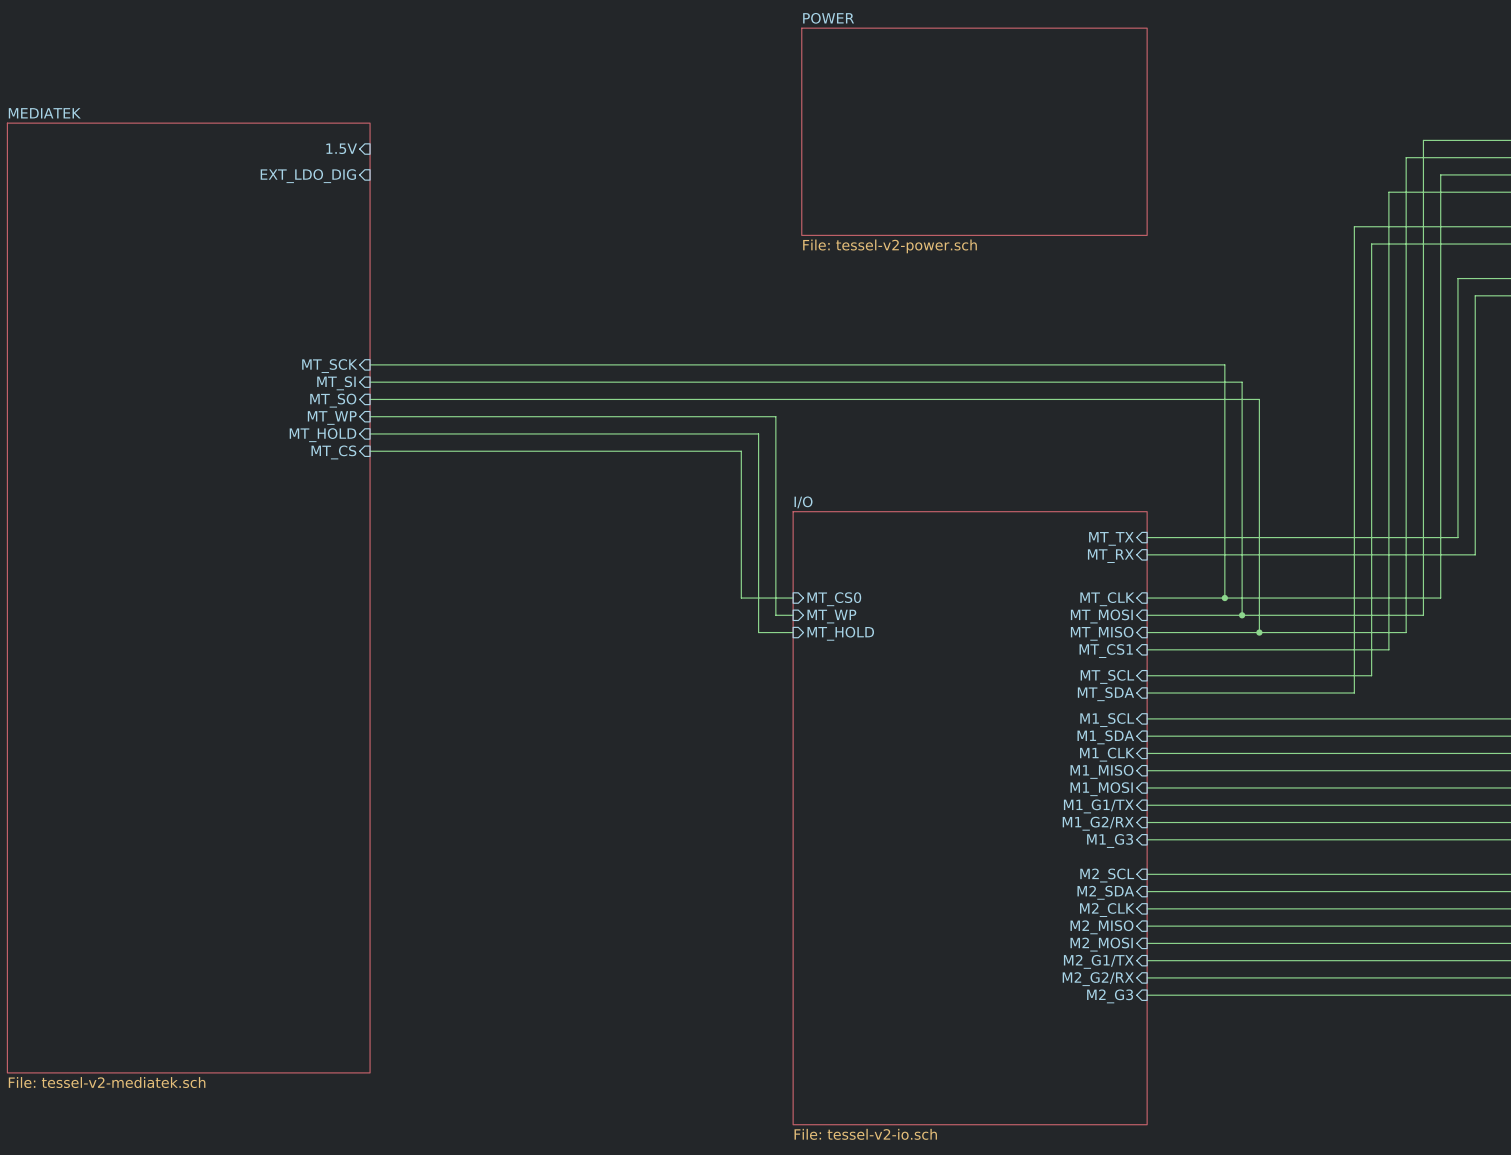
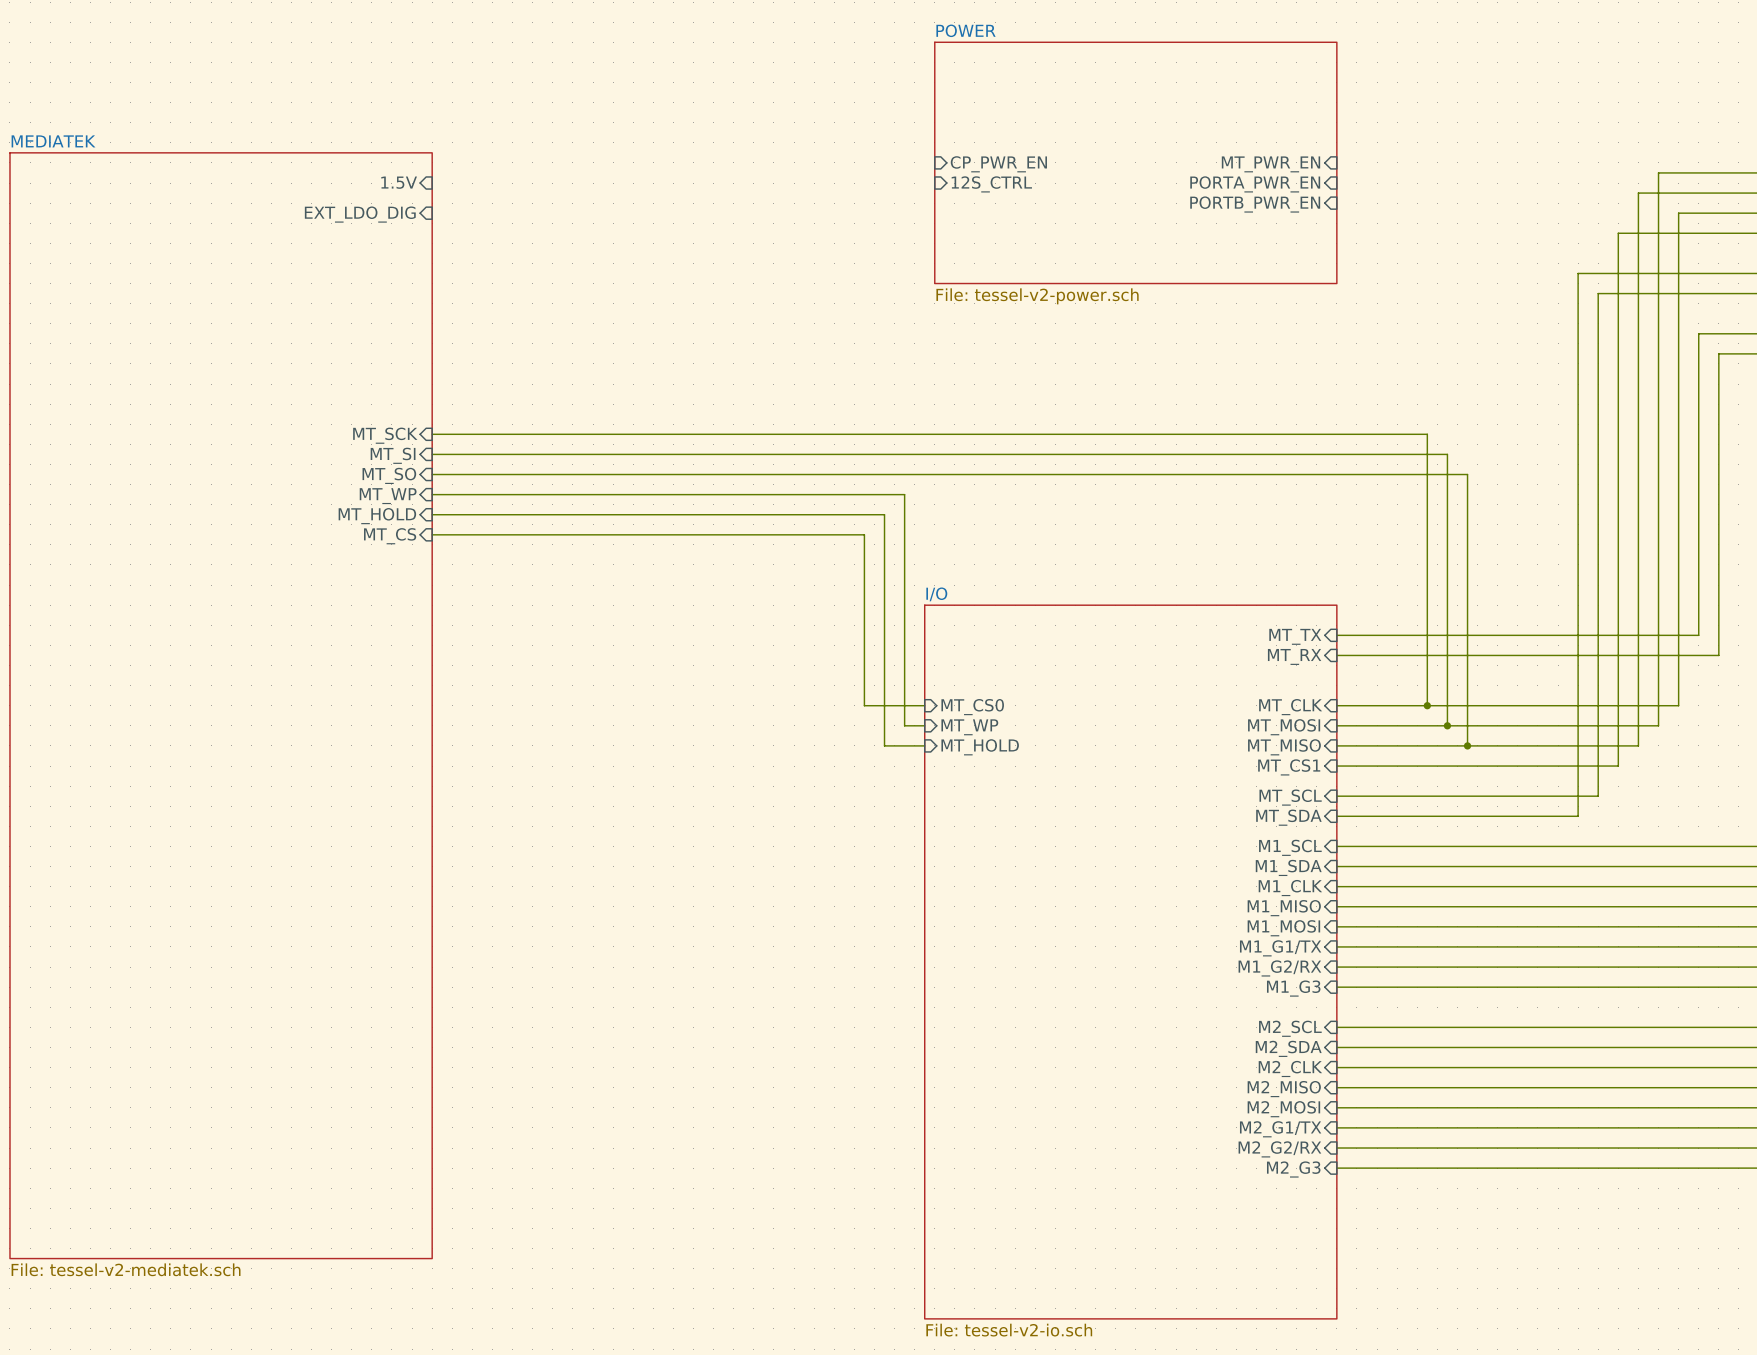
sheet pin: none -> CP_PWR_EN (998, 164)
sheet pin: none -> MT_PWR_EN (1270, 164)
sheet pin: none -> 12S_CTRL (991, 184)
sheet pin: none -> PORTA_PWR_EN (1255, 184)
sheet pin: none -> PORTB_PWR_EN (1255, 204)

